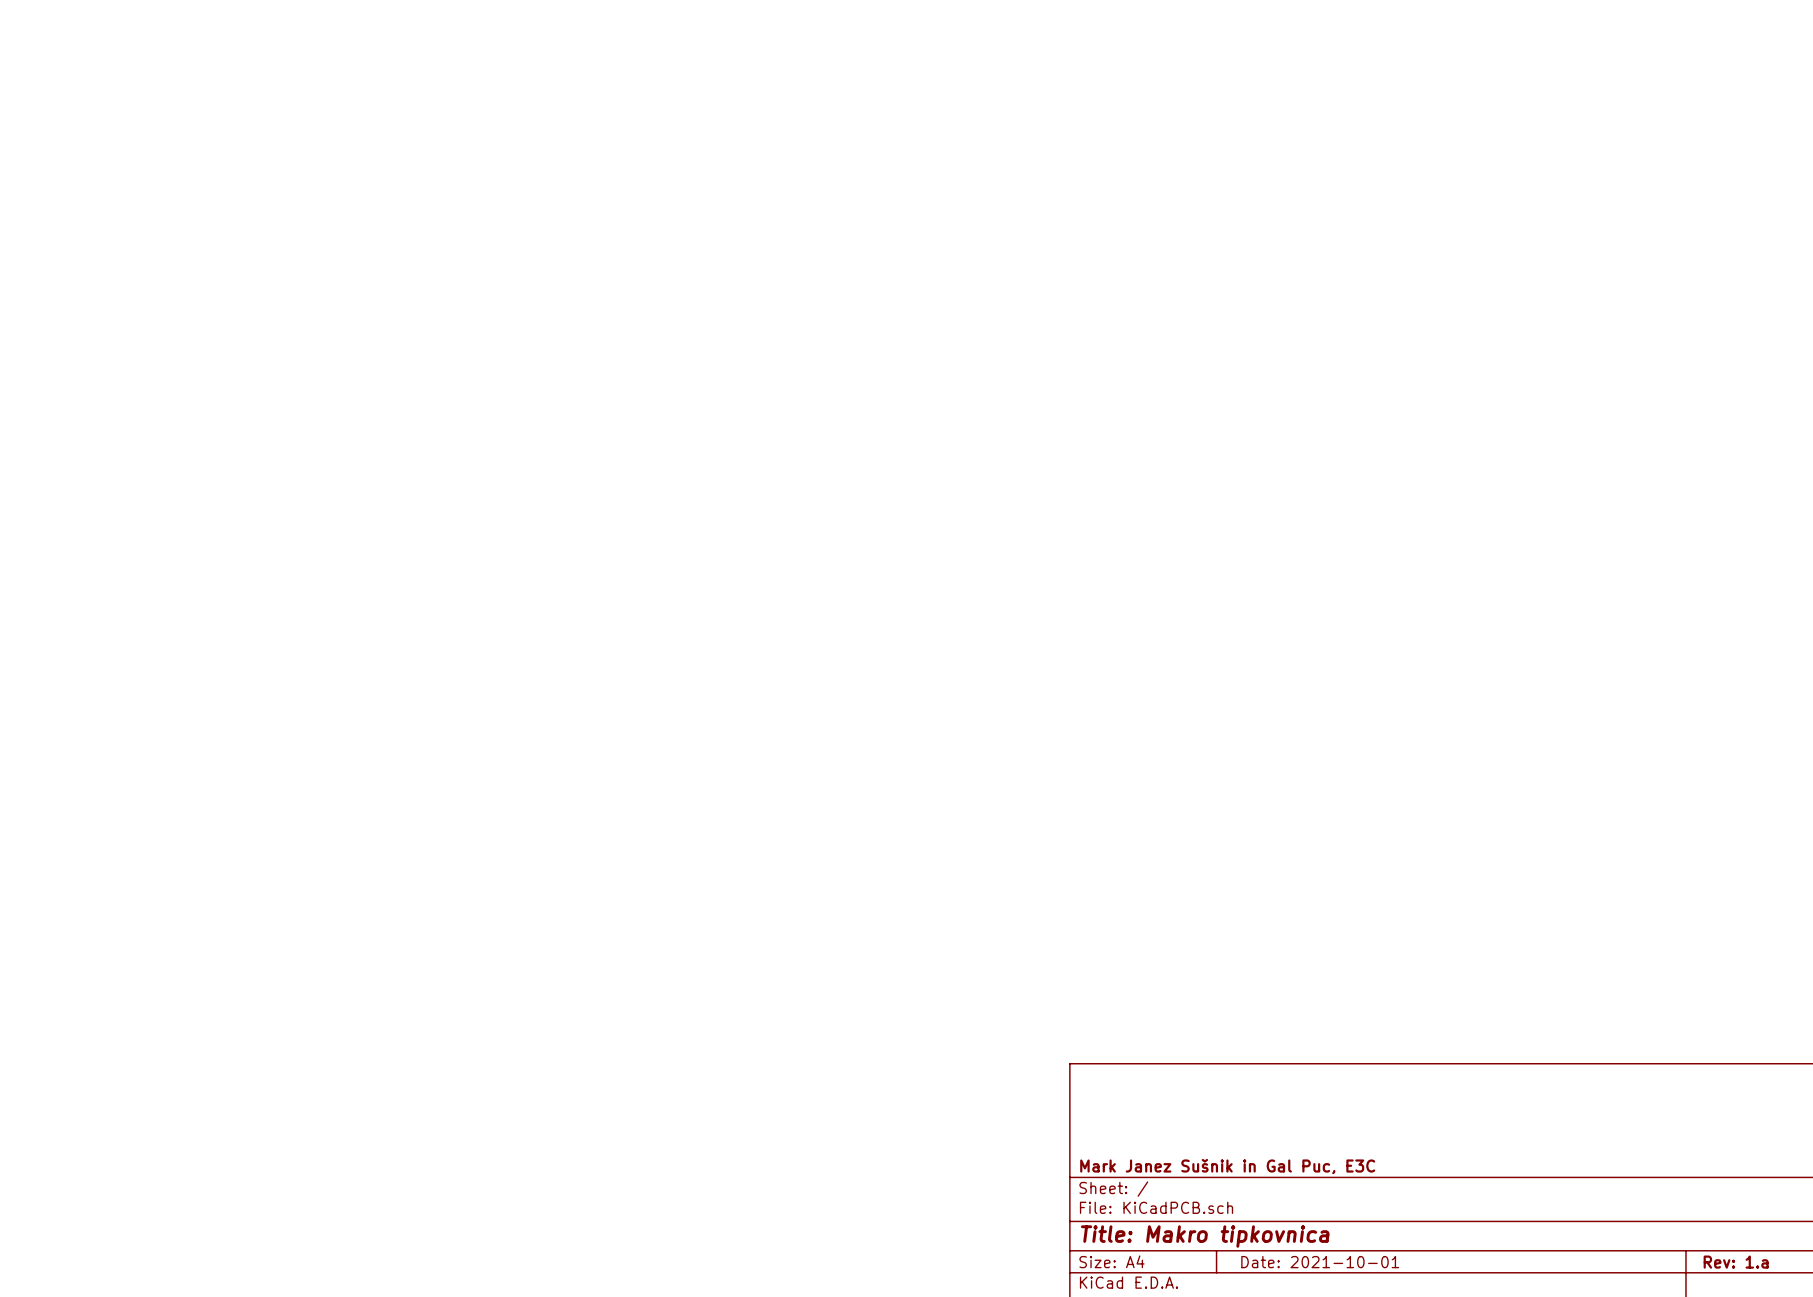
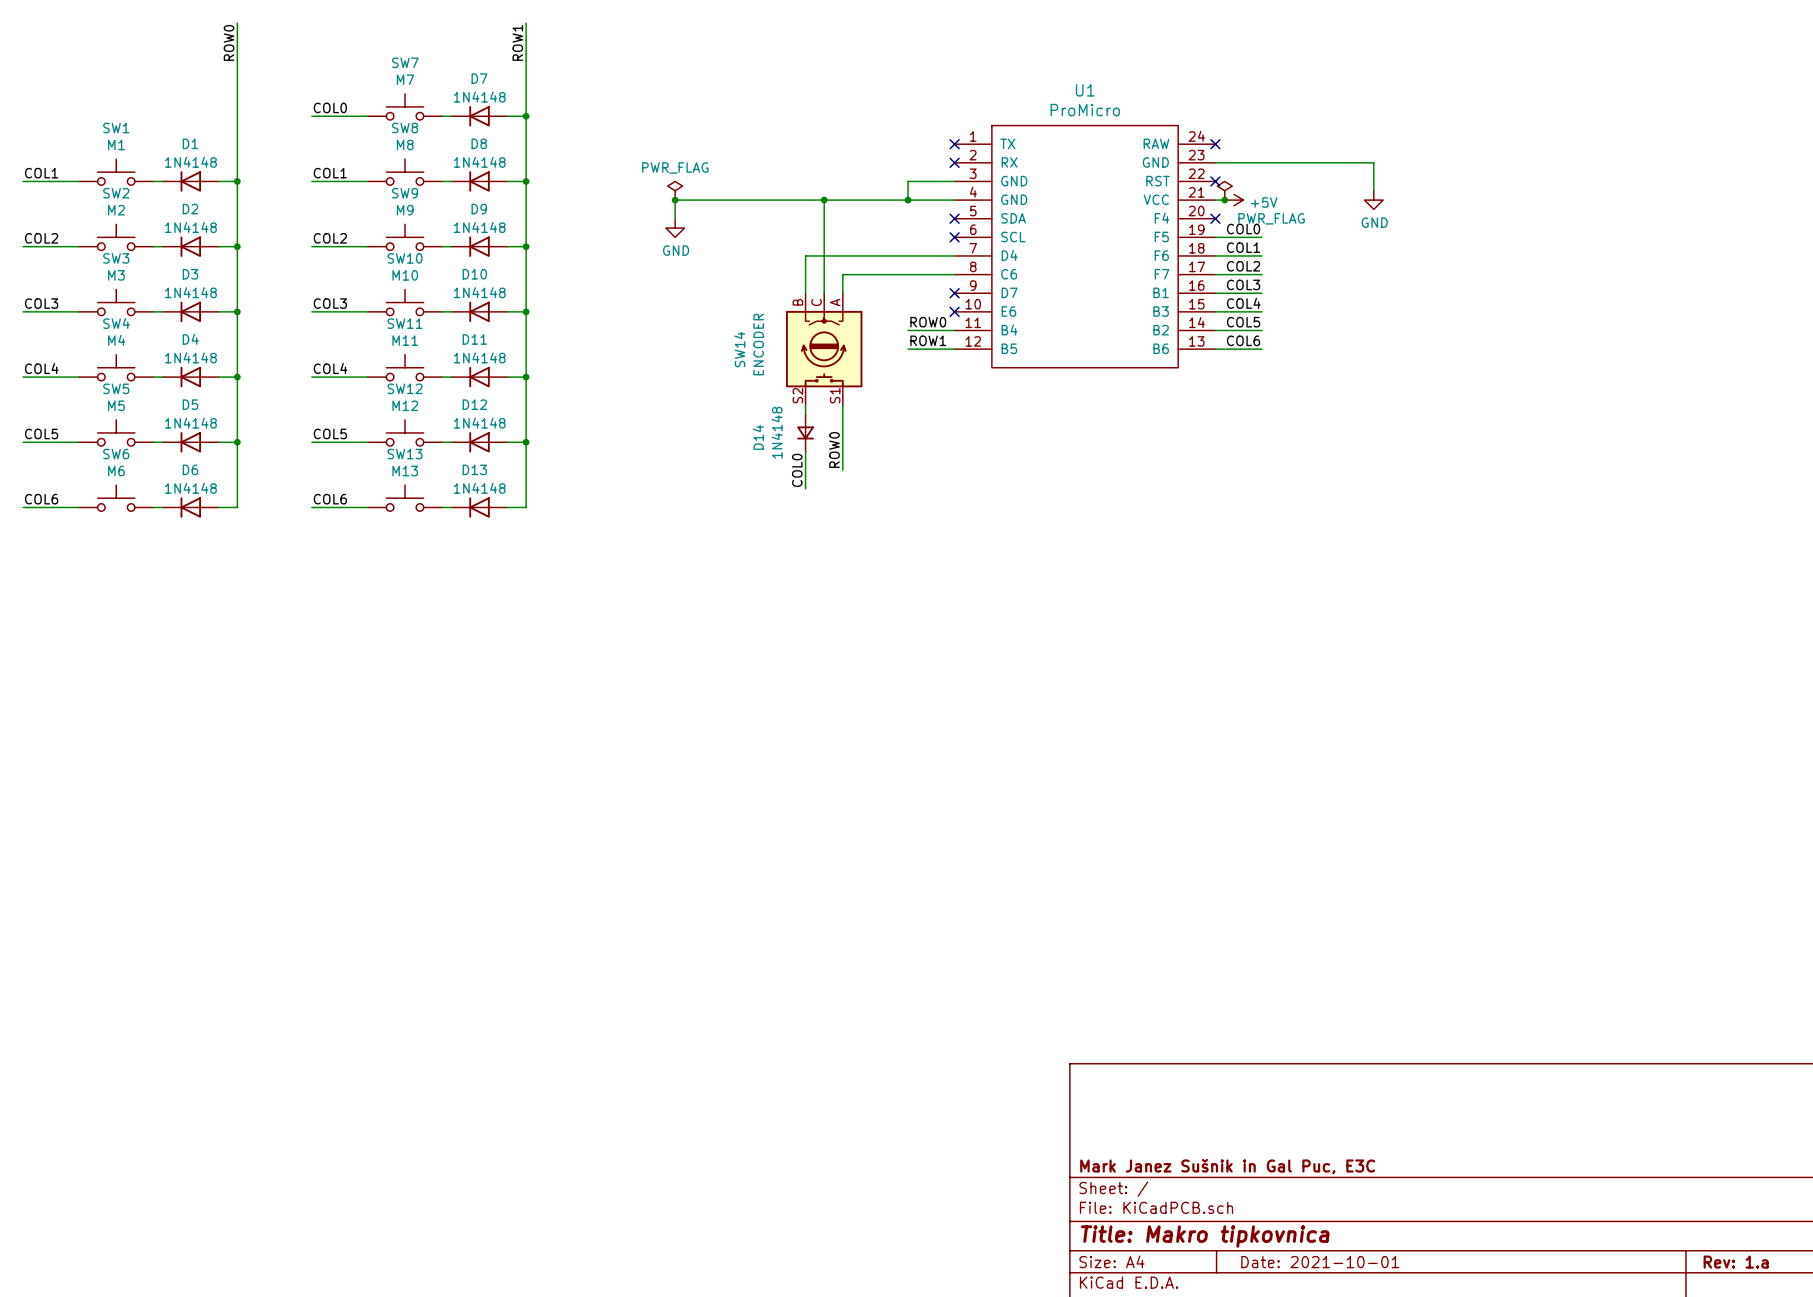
wire: none -> (237, 23) (237, 507) (218, 507)
wire: none -> (526, 23) (526, 507) (507, 507)
label: none -> ROW0 (229, 42)
label: none -> ROW1 (517, 42)
SW7: none -> M7 (405, 106)
label: none -> COL0 (330, 107)
wire: none -> (311, 116) (367, 116)
wire: none -> (442, 116) (451, 116)
D7: none -> 1N4148 (479, 116)
wire: none -> (507, 116) (526, 116)
junction: none -> (526, 116)
no-connect mark: none -> (954, 144)
no-connect mark: none -> (1215, 144)
no-connect mark: none -> (954, 162)
wire: none -> (1215, 162) (1373, 162) (1373, 190)
SW1: none -> M1 (116, 172)
SW8: none -> M8 (405, 172)
label: none -> COL1 (41, 173)
label: none -> COL1 (330, 173)
wire: none -> (23, 181) (78, 181)
wire: none -> (153, 181) (162, 181)
D1: none -> 1N4148 (190, 181)
wire: none -> (218, 181) (237, 181)
junction: none -> (237, 181)
wire: none -> (311, 181) (367, 181)
wire: none -> (442, 181) (451, 181)
D8: none -> 1N4148 (479, 181)
wire: none -> (507, 181) (526, 181)
junction: none -> (526, 181)
wire: none -> (954, 181) (908, 181) (908, 200)
no-connect mark: none -> (1215, 181)
power symbol: none -> PWR_FLAG (675, 190)
power symbol: none -> PWR_FLAG (1224, 190)
junction: none -> (675, 200)
wire: none -> (824, 200) (824, 293)
junction: none -> (824, 200)
junction: none -> (908, 200)
wire: none -> (954, 200) (675, 200) (675, 218)
wire: none -> (1215, 200) (1224, 200)
junction: none -> (1224, 200)
power symbol: none -> +5V (1234, 200)
power symbol: none -> GND (1373, 200)
no-connect mark: none -> (954, 218)
no-connect mark: none -> (1215, 218)
power symbol: none -> GND (675, 228)
label: none -> COL0 (1243, 229)
SW2: none -> M2 (116, 237)
SW9: none -> M9 (405, 237)
no-connect mark: none -> (954, 237)
wire: none -> (1215, 237) (1262, 237)
label: none -> COL2 (41, 238)
label: none -> COL2 (330, 238)
wire: none -> (23, 246) (78, 246)
wire: none -> (153, 246) (162, 246)
D2: none -> 1N4148 (190, 246)
wire: none -> (218, 246) (237, 246)
junction: none -> (237, 246)
wire: none -> (311, 246) (367, 246)
wire: none -> (442, 246) (451, 246)
D9: none -> 1N4148 (479, 246)
wire: none -> (507, 246) (526, 246)
junction: none -> (526, 246)
U1: none -> ProMicro (1085, 246)
label: none -> COL1 (1243, 247)
wire: none -> (954, 255) (805, 255) (805, 293)
wire: none -> (1215, 255) (1262, 255)
label: none -> COL2 (1243, 266)
wire: none -> (954, 274) (842, 274) (842, 293)
wire: none -> (1215, 274) (1262, 274)
label: none -> COL3 (1243, 284)
no-connect mark: none -> (954, 293)
wire: none -> (1215, 293) (1262, 293)
SW3: none -> M3 (116, 302)
SW10: none -> M10 (405, 302)
label: none -> COL3 (41, 303)
label: none -> COL3 (330, 303)
label: none -> COL4 (1243, 303)
wire: none -> (23, 311) (78, 311)
wire: none -> (153, 311) (162, 311)
D3: none -> 1N4148 (190, 311)
wire: none -> (218, 311) (237, 311)
junction: none -> (237, 311)
wire: none -> (311, 311) (367, 311)
wire: none -> (442, 311) (451, 311)
D10: none -> 1N4148 (479, 311)
wire: none -> (507, 311) (526, 311)
junction: none -> (526, 311)
no-connect mark: none -> (954, 311)
wire: none -> (1215, 311) (1262, 311)
label: none -> ROW0 (928, 322)
label: none -> COL5 (1243, 322)
wire: none -> (908, 330) (954, 330)
wire: none -> (1215, 330) (1262, 330)
label: none -> ROW1 (928, 340)
label: none -> COL6 (1243, 340)
SW14: none -> ENCODER (824, 349)
wire: none -> (908, 349) (954, 349)
wire: none -> (1215, 349) (1262, 349)
SW4: none -> M4 (116, 367)
SW11: none -> M11 (405, 367)
label: none -> COL4 (41, 368)
label: none -> COL4 (330, 368)
wire: none -> (23, 377) (78, 377)
wire: none -> (153, 377) (162, 377)
D4: none -> 1N4148 (190, 377)
wire: none -> (218, 377) (237, 377)
junction: none -> (237, 377)
wire: none -> (311, 377) (367, 377)
wire: none -> (442, 377) (451, 377)
D11: none -> 1N4148 (479, 377)
wire: none -> (507, 377) (526, 377)
junction: none -> (526, 377)
wire: none -> (805, 405) (805, 414)
wire: none -> (842, 405) (842, 470)
SW5: none -> M5 (116, 432)
SW12: none -> M12 (405, 432)
D14: none -> 1N4148 (805, 432)
label: none -> COL5 (41, 433)
label: none -> COL5 (330, 433)
wire: none -> (23, 442) (78, 442)
wire: none -> (153, 442) (162, 442)
D5: none -> 1N4148 (190, 442)
wire: none -> (218, 442) (237, 442)
junction: none -> (237, 442)
wire: none -> (311, 442) (367, 442)
wire: none -> (442, 442) (451, 442)
D12: none -> 1N4148 (479, 442)
wire: none -> (507, 442) (526, 442)
junction: none -> (526, 442)
label: none -> ROW0 (834, 449)
wire: none -> (805, 451) (805, 488)
label: none -> COL0 (797, 470)
SW6: none -> M6 (116, 498)
SW13: none -> M13 (405, 498)
label: none -> COL6 (41, 499)
label: none -> COL6 (330, 499)
wire: none -> (23, 507) (78, 507)
wire: none -> (153, 507) (162, 507)
D6: none -> 1N4148 (190, 507)
wire: none -> (311, 507) (367, 507)
wire: none -> (442, 507) (451, 507)
D13: none -> 1N4148 (479, 507)

